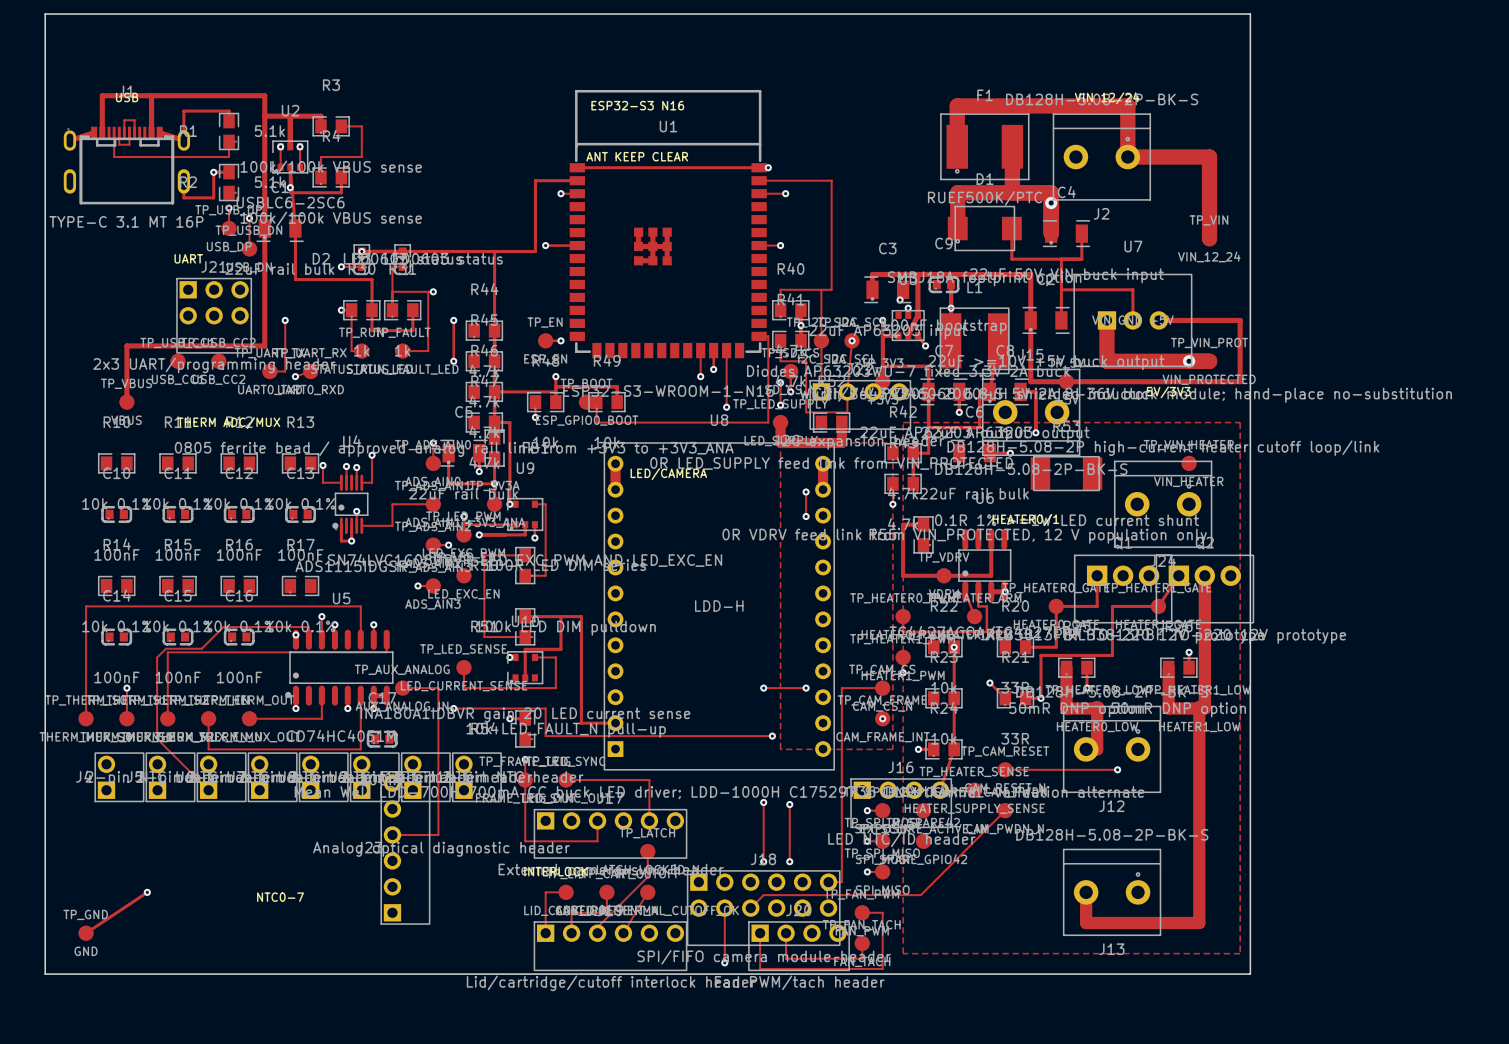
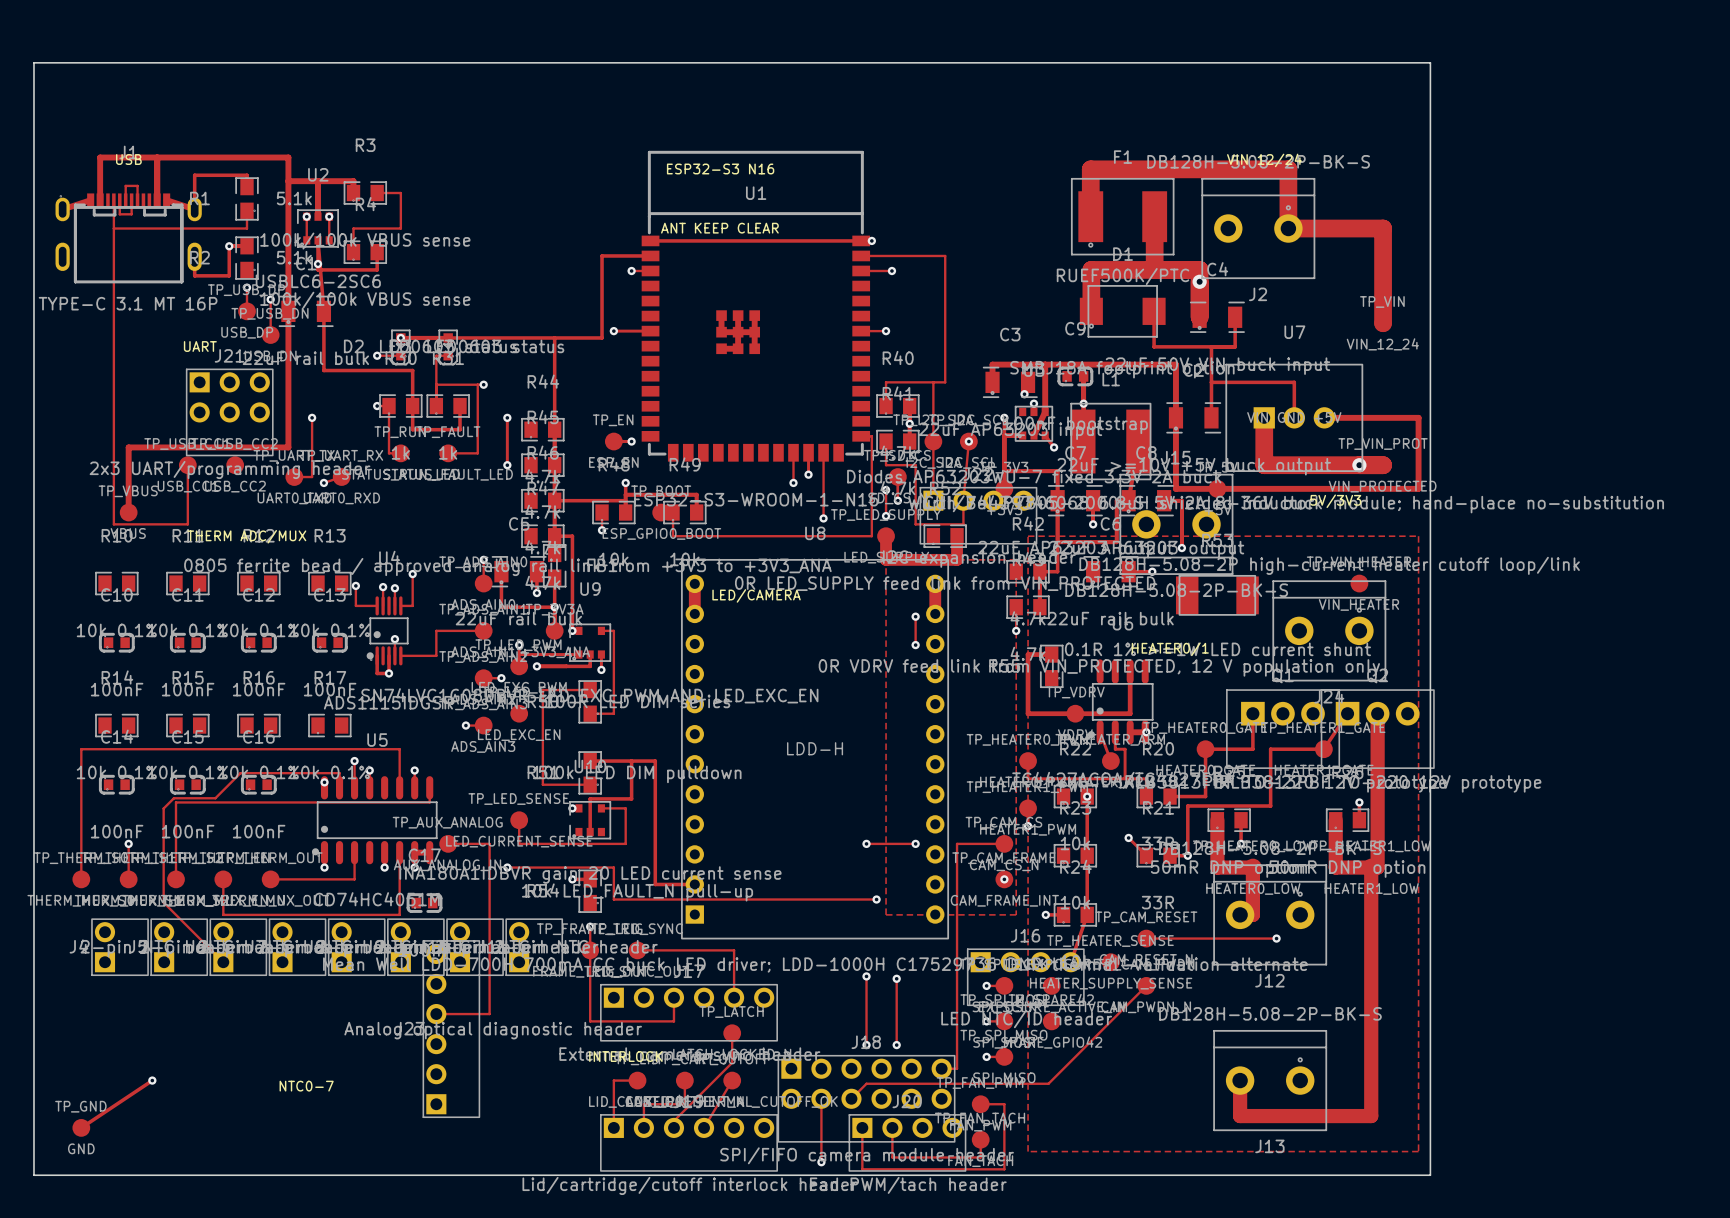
track: none -> (113, 228) (113, 524) (187, 524) (187, 465)

